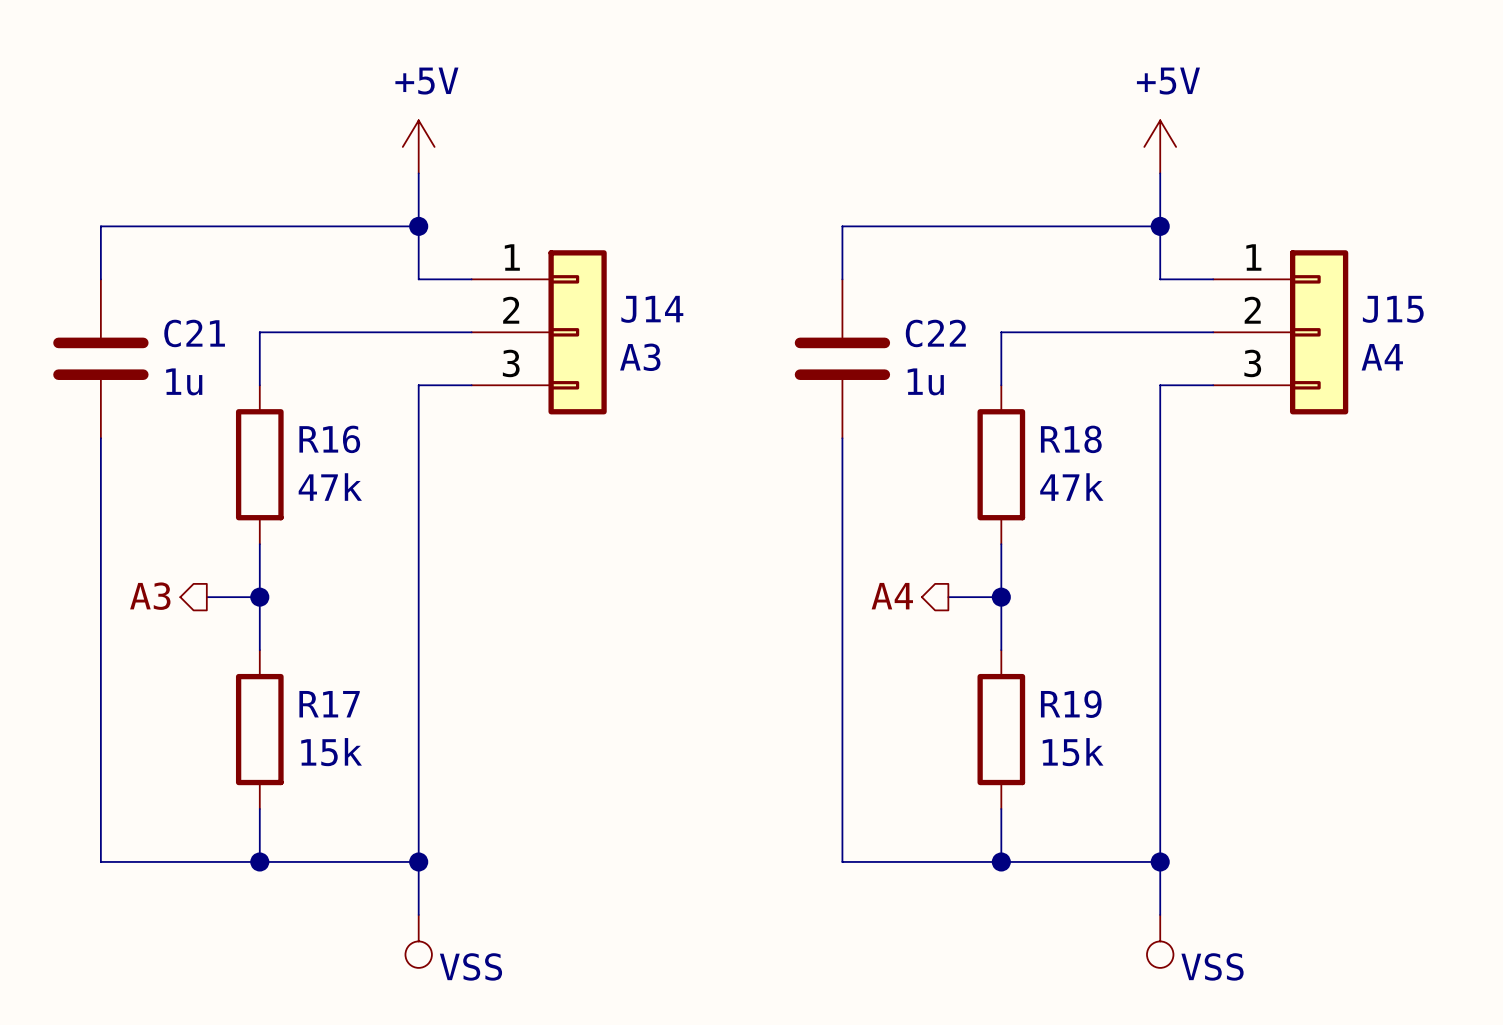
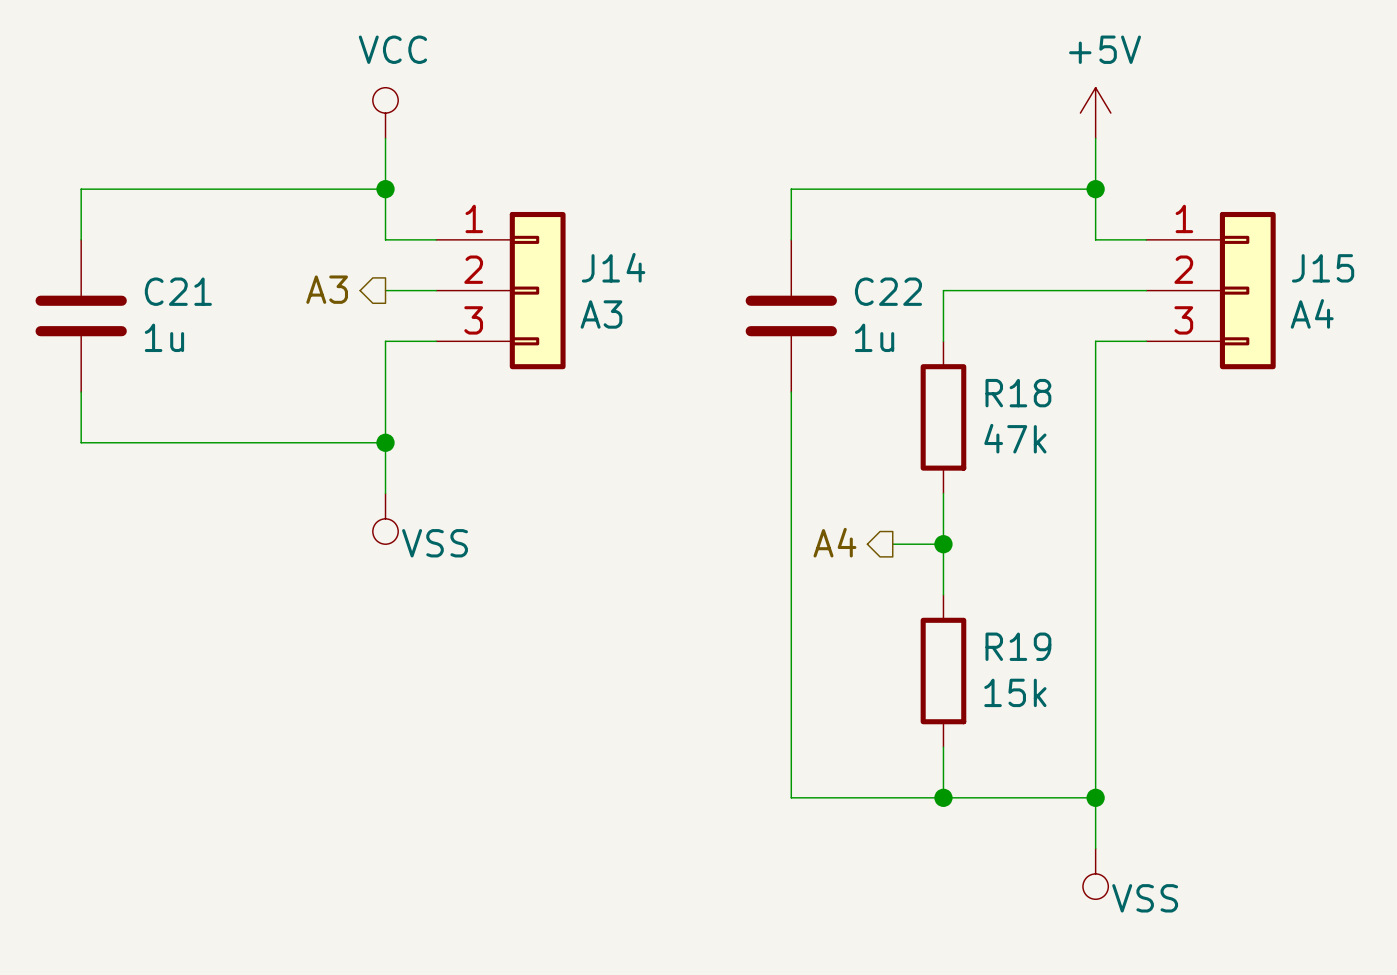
power symbol: +5V (418, 146) -> VCC (385, 113)
wire: (418, 332) (259, 332) (259, 385) -> none
R16: 47k (259, 464) -> none
wire: (100, 491) (100, 861) (418, 861) -> (81, 442) (385, 442)
junction: none -> (385, 442)
wire: (259, 544) (259, 650) -> none
wire: (418, 544) (418, 914) -> none
hierarchical label position: A3 (150, 596) -> A3 (327, 289)
wire: (206, 597) (259, 597) -> none
junction: (259, 597) -> none
R17: 15k (259, 729) -> none
wire: (259, 809) (259, 861) -> none
junction: (259, 861) -> none
junction: (418, 861) -> none
power symbol position: VSS (418, 941) -> VSS (385, 518)

